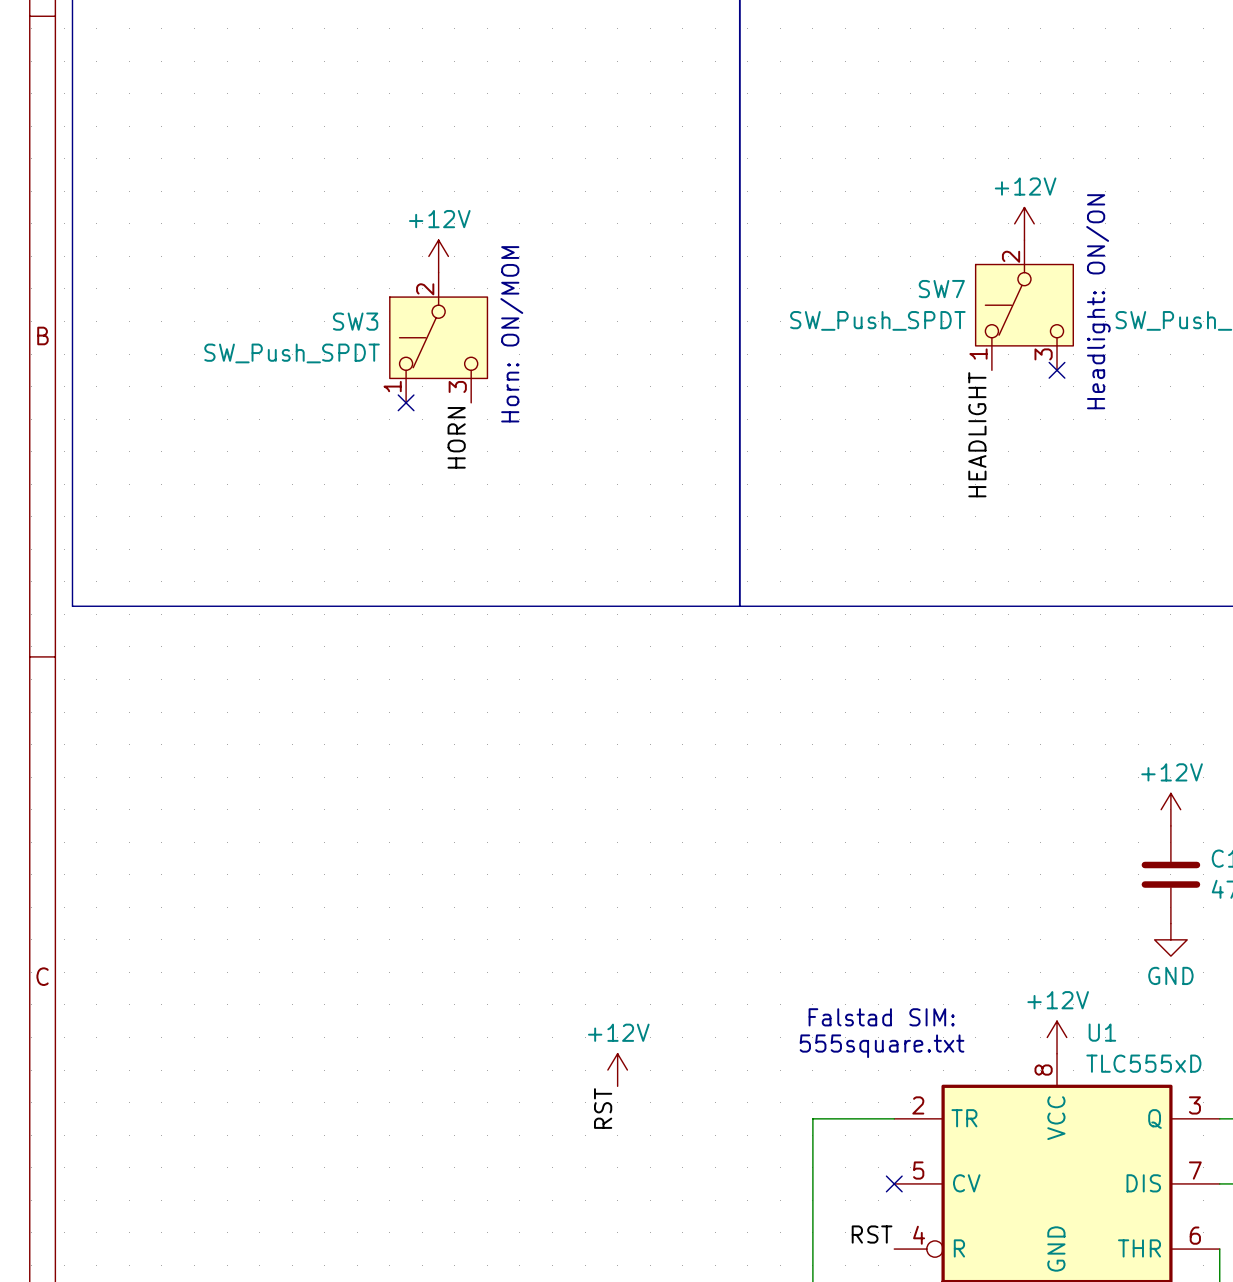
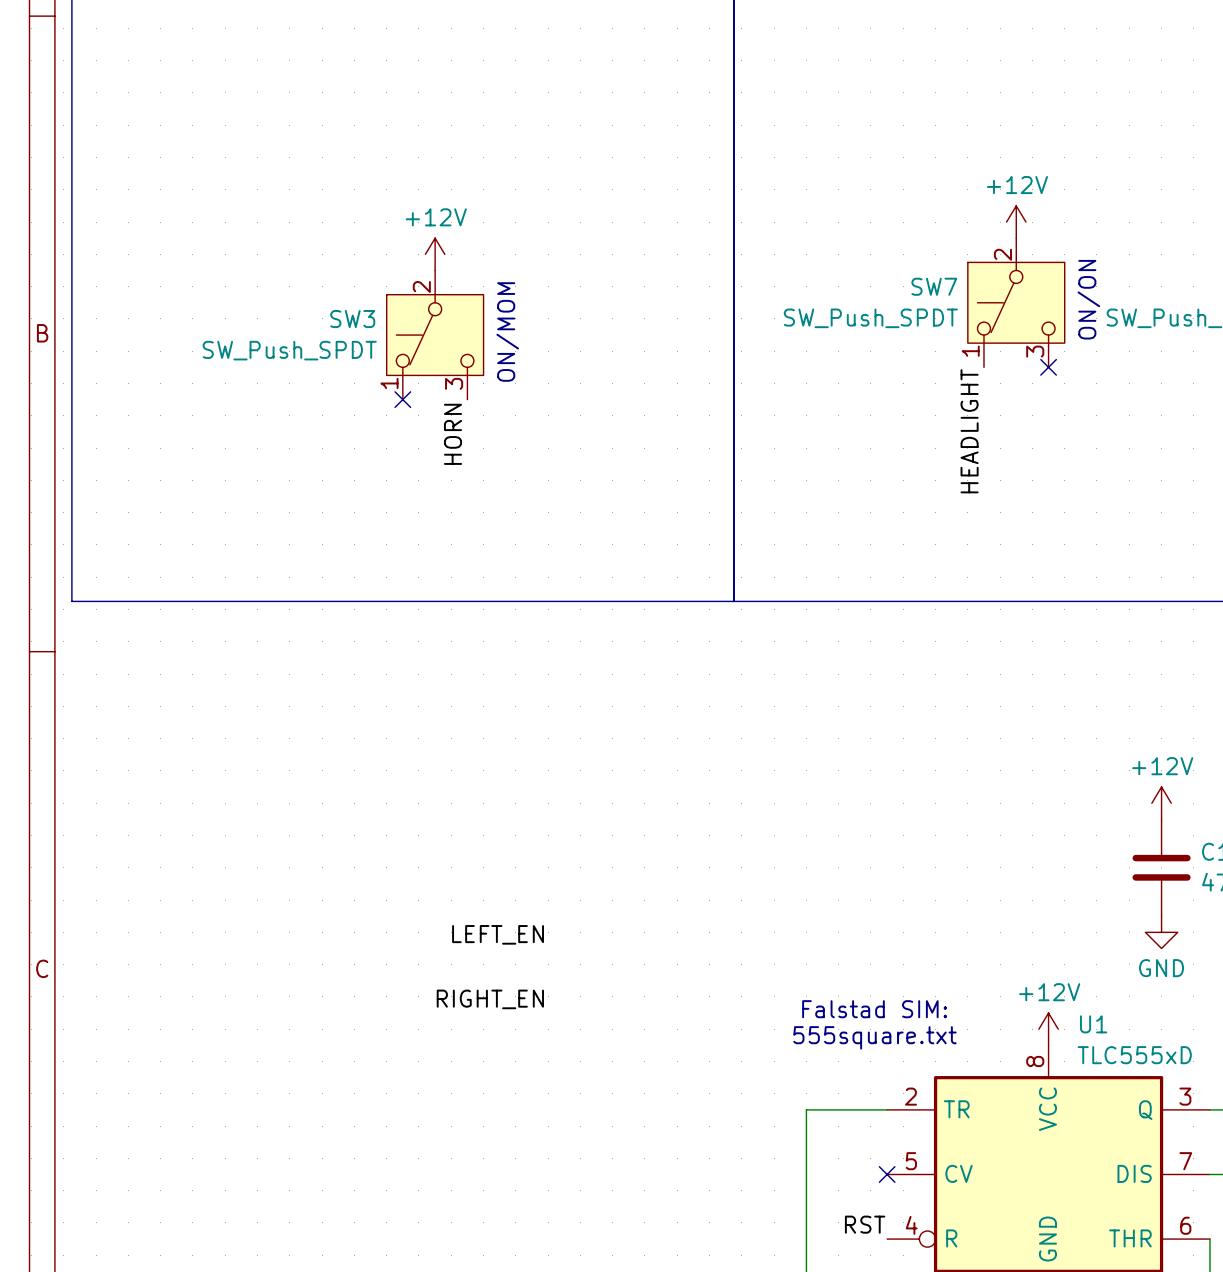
text: Headlight: ON/ON (1098, 301) -> ON/ON (1088, 299)
text: Horn: ON/MOM (511, 334) -> ON/MOM (507, 332)
label: none -> LEFT_EN (498, 934)
label: none -> RIGHT_EN (490, 999)
power symbol: +12V (617, 1070) -> none
label: RST (603, 1108) -> none

